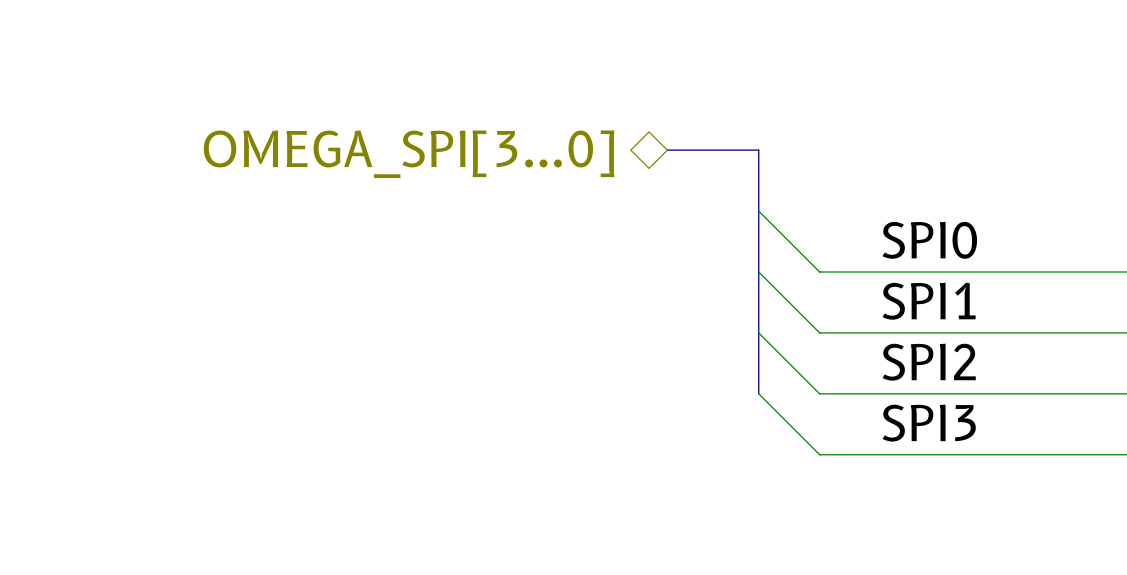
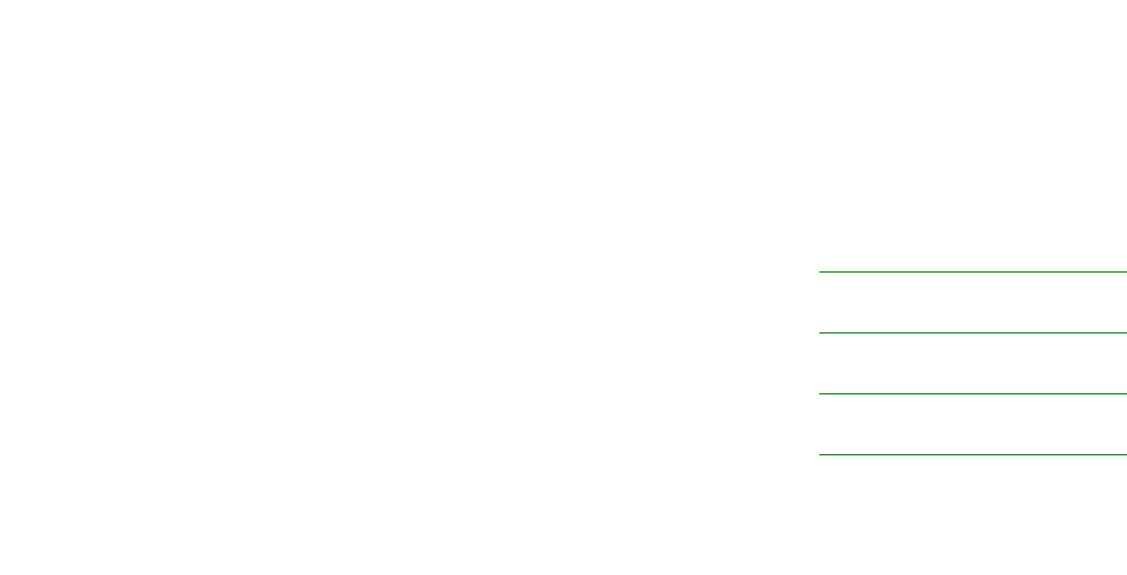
bus: (667, 150) (758, 150) (758, 393) -> none
hierarchical label: OMEGA_SPI[3...0] (409, 154) -> none
wire: (758, 211) (819, 271) -> none
label: SPI0 (929, 240) -> none
wire: (758, 271) (819, 332) -> none
label: SPI1 (929, 301) -> none
wire: (758, 332) (819, 393) -> none
label: SPI2 (929, 362) -> none
wire: (758, 393) (819, 454) -> none
label: SPI3 (929, 423) -> none

